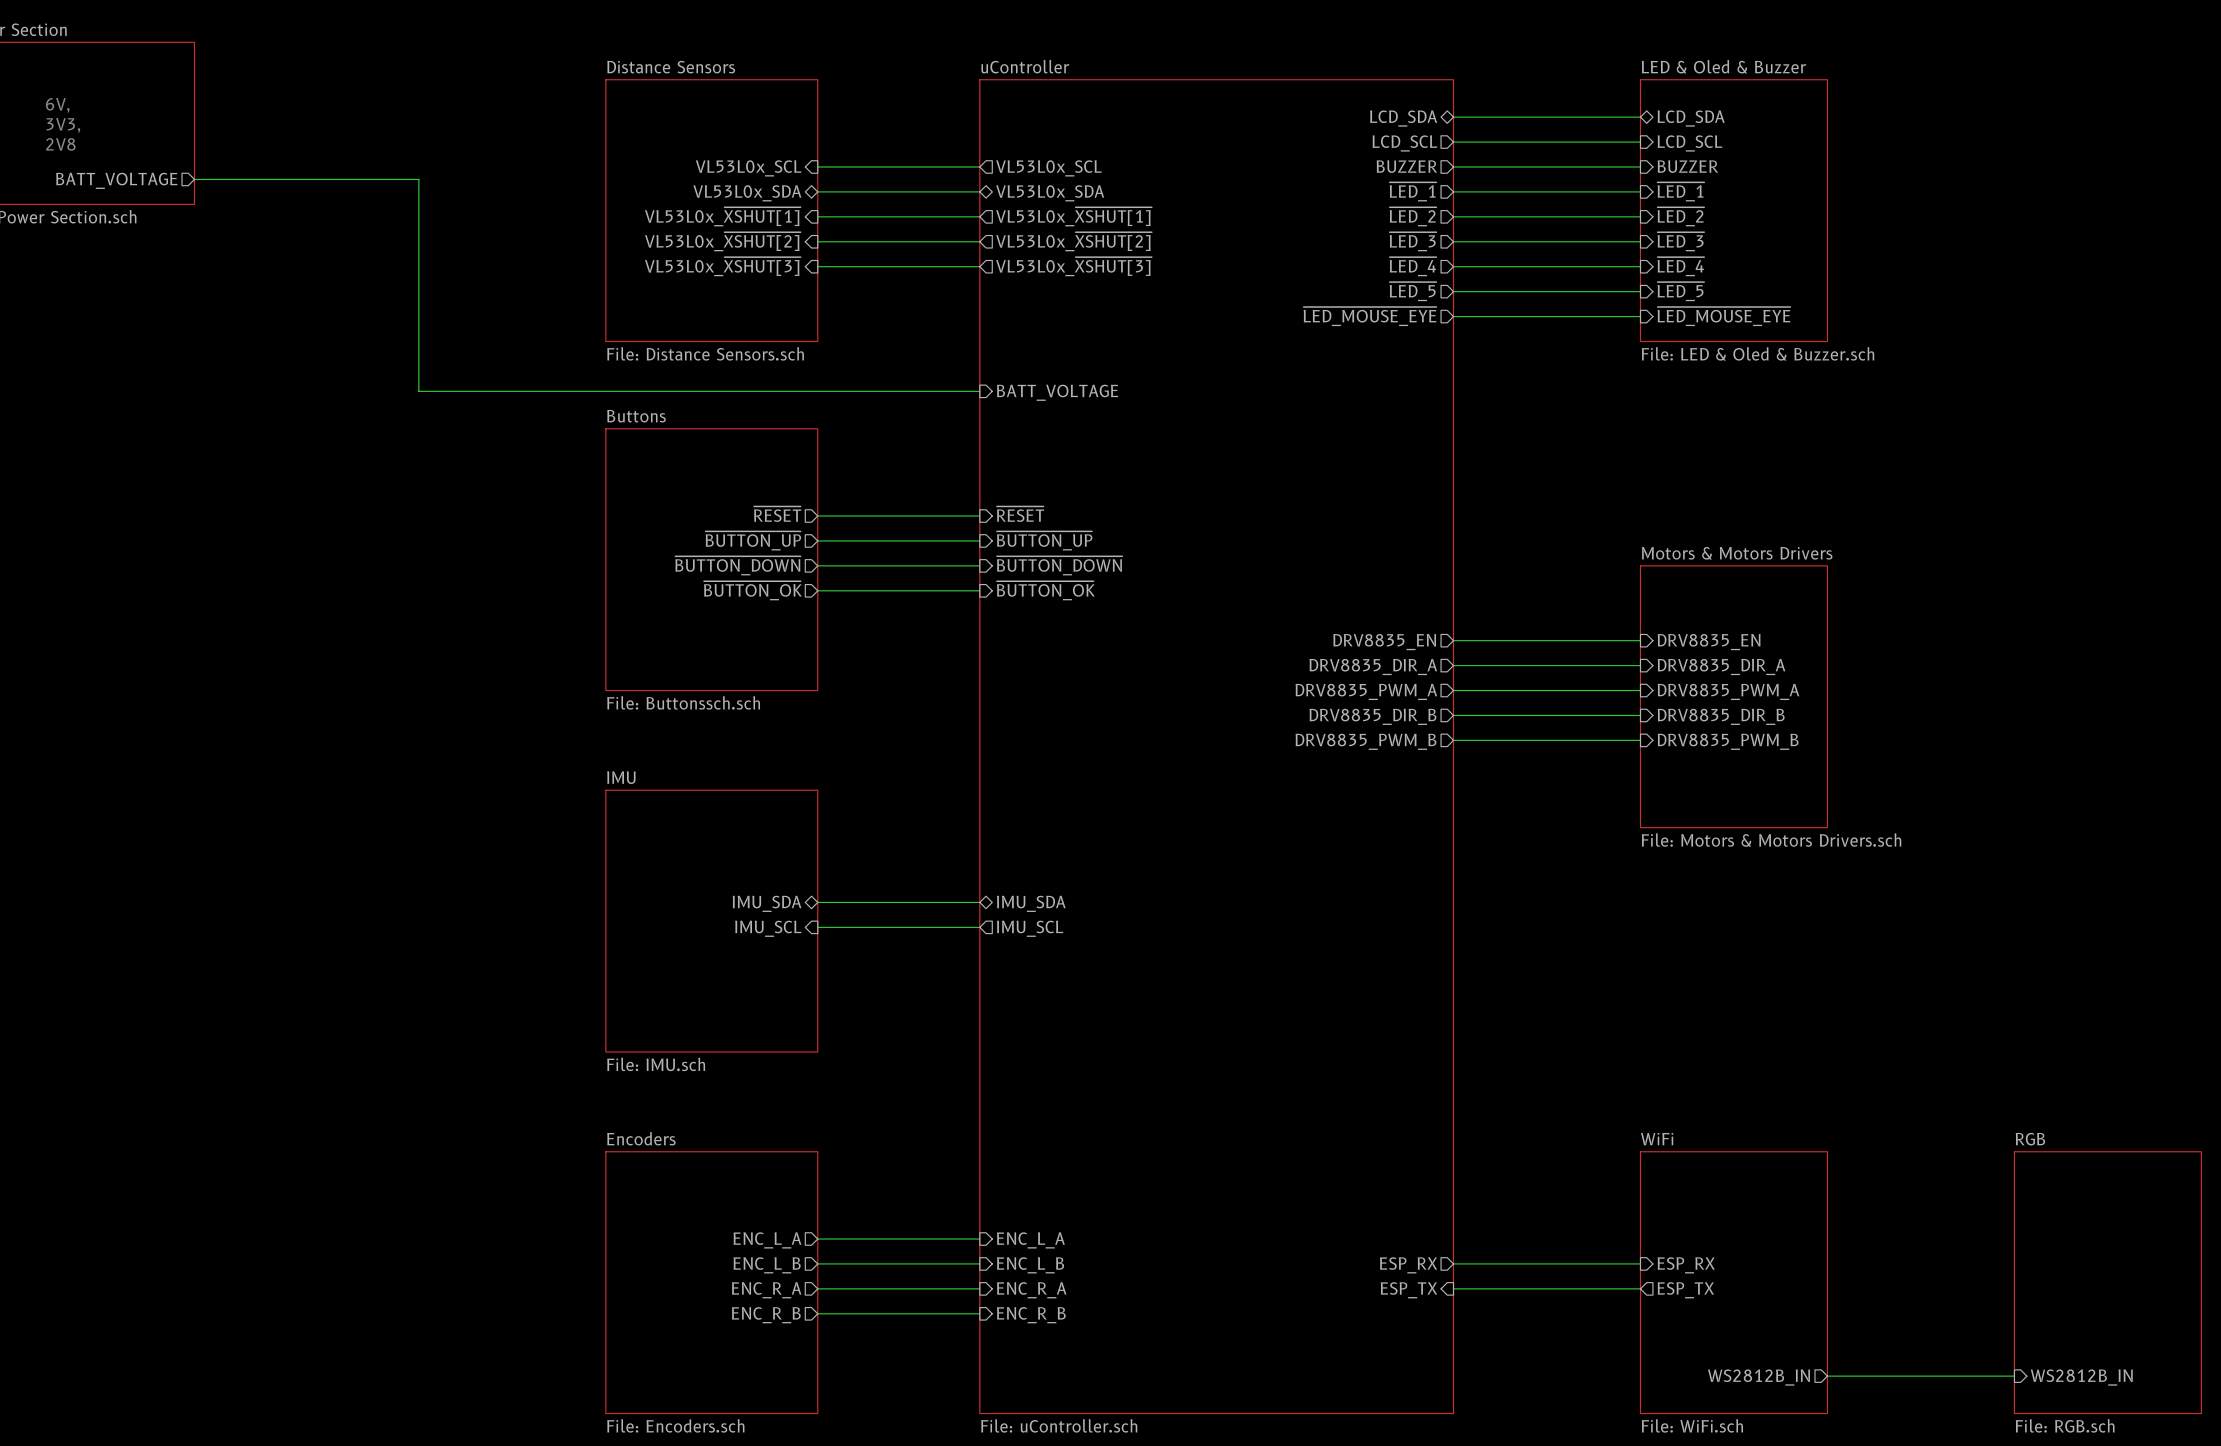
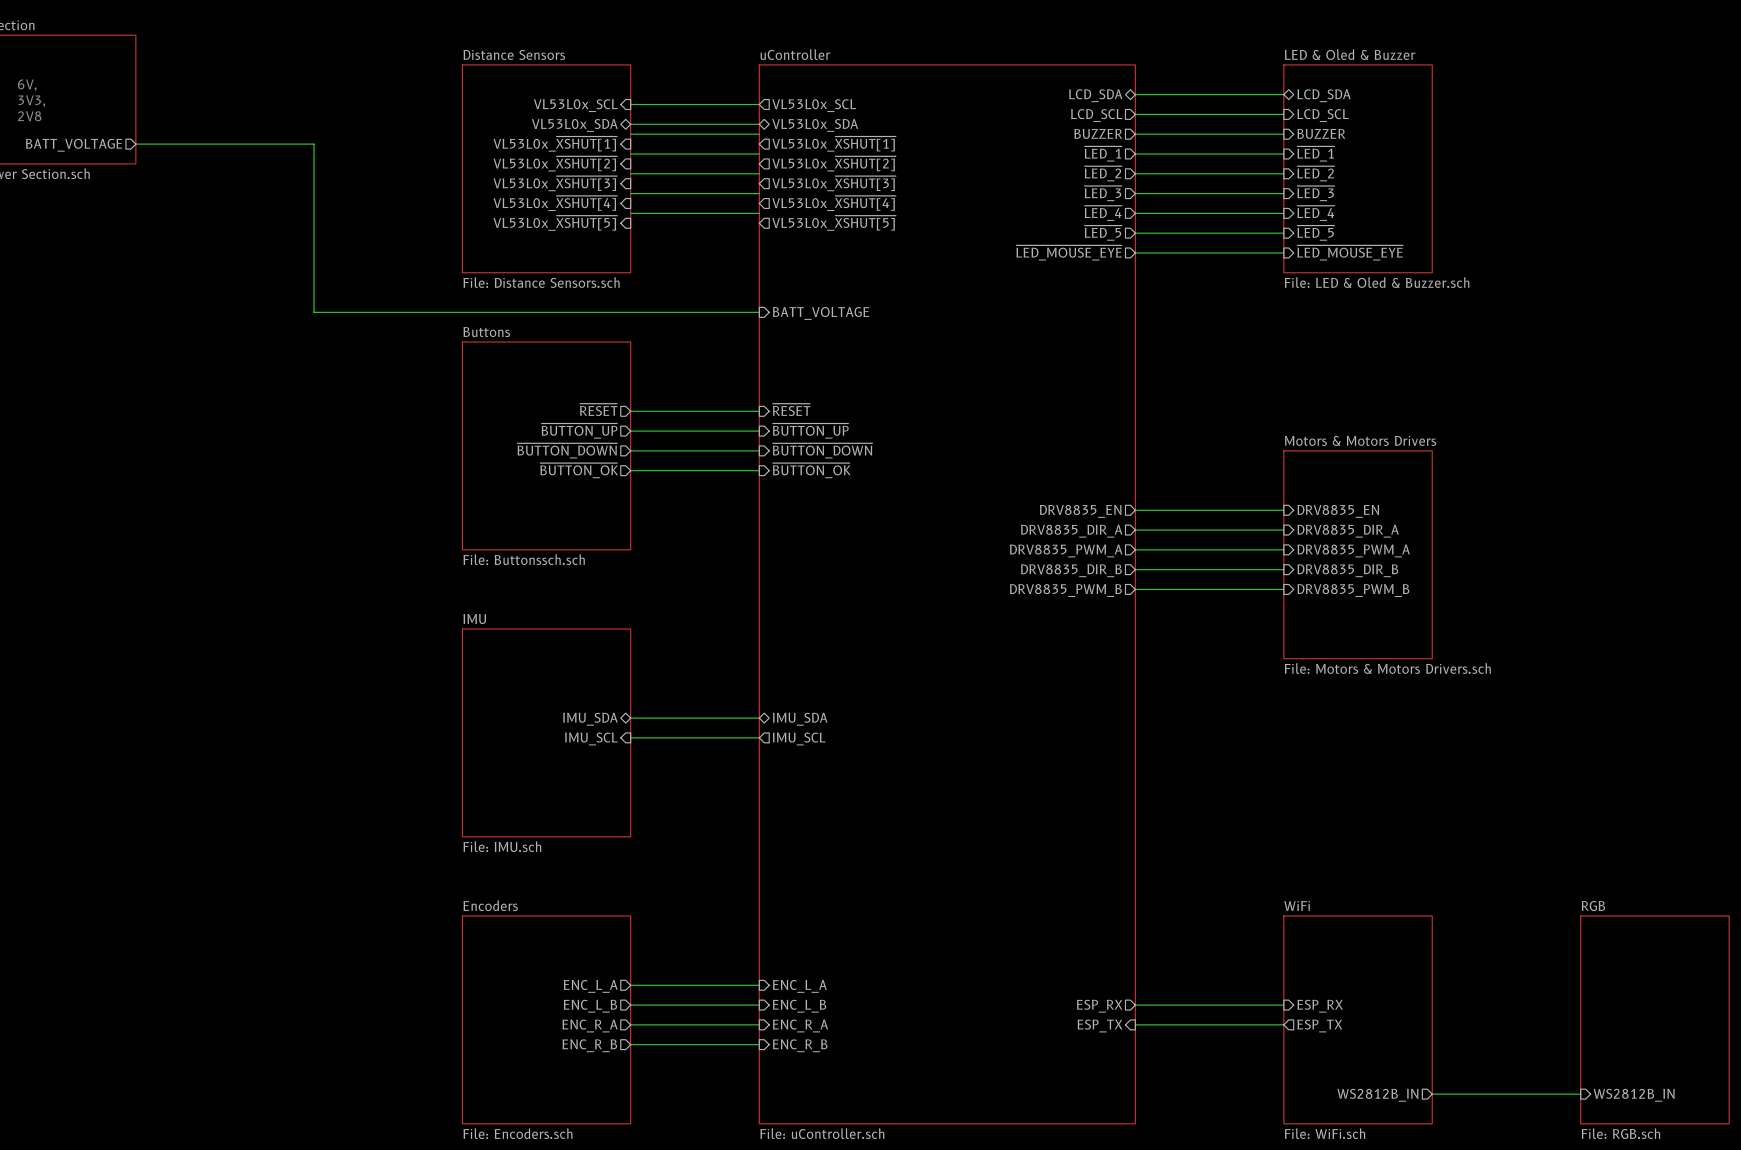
wire: none -> (630, 104) (759, 104)
wire: none -> (630, 124) (759, 124)
sheet pin position: VL53L0x_SCL (748, 168) -> VL53L0x_SCL (575, 105)
sheet pin position: VL53L0x_SCL (1048, 168) -> VL53L0x_SCL (814, 105)
sheet pin position: VL53L0x_SDA (747, 193) -> VL53L0x_SDA (574, 125)
sheet pin position: VL53L0x_SDA (1050, 193) -> VL53L0x_SDA (815, 125)
sheet pin position: VL53L0x_~{XSHUT[1]} (722, 216) -> VL53L0x_~{XSHUT[1]} (555, 144)
sheet pin position: VL53L0x_~{XSHUT[1]} (1074, 216) -> VL53L0x_~{XSHUT[1]} (834, 144)
sheet pin position: VL53L0x_~{XSHUT[2]} (722, 241) -> VL53L0x_~{XSHUT[2]} (555, 163)
sheet pin position: VL53L0x_~{XSHUT[2]} (1074, 241) -> VL53L0x_~{XSHUT[2]} (834, 163)
sheet pin: none -> VL53L0x_~{XSHUT[4]} (555, 203)
sheet pin: none -> VL53L0x_~{XSHUT[4]} (834, 203)
sheet pin position: VL53L0x_~{XSHUT[3]} (722, 266) -> VL53L0x_~{XSHUT[3]} (555, 183)
sheet pin position: VL53L0x_~{XSHUT[3]} (1074, 266) -> VL53L0x_~{XSHUT[3]} (834, 183)
sheet pin: none -> VL53L0x_~{XSHUT[5]} (555, 223)
sheet pin: none -> VL53L0x_~{XSHUT[5]} (834, 223)

